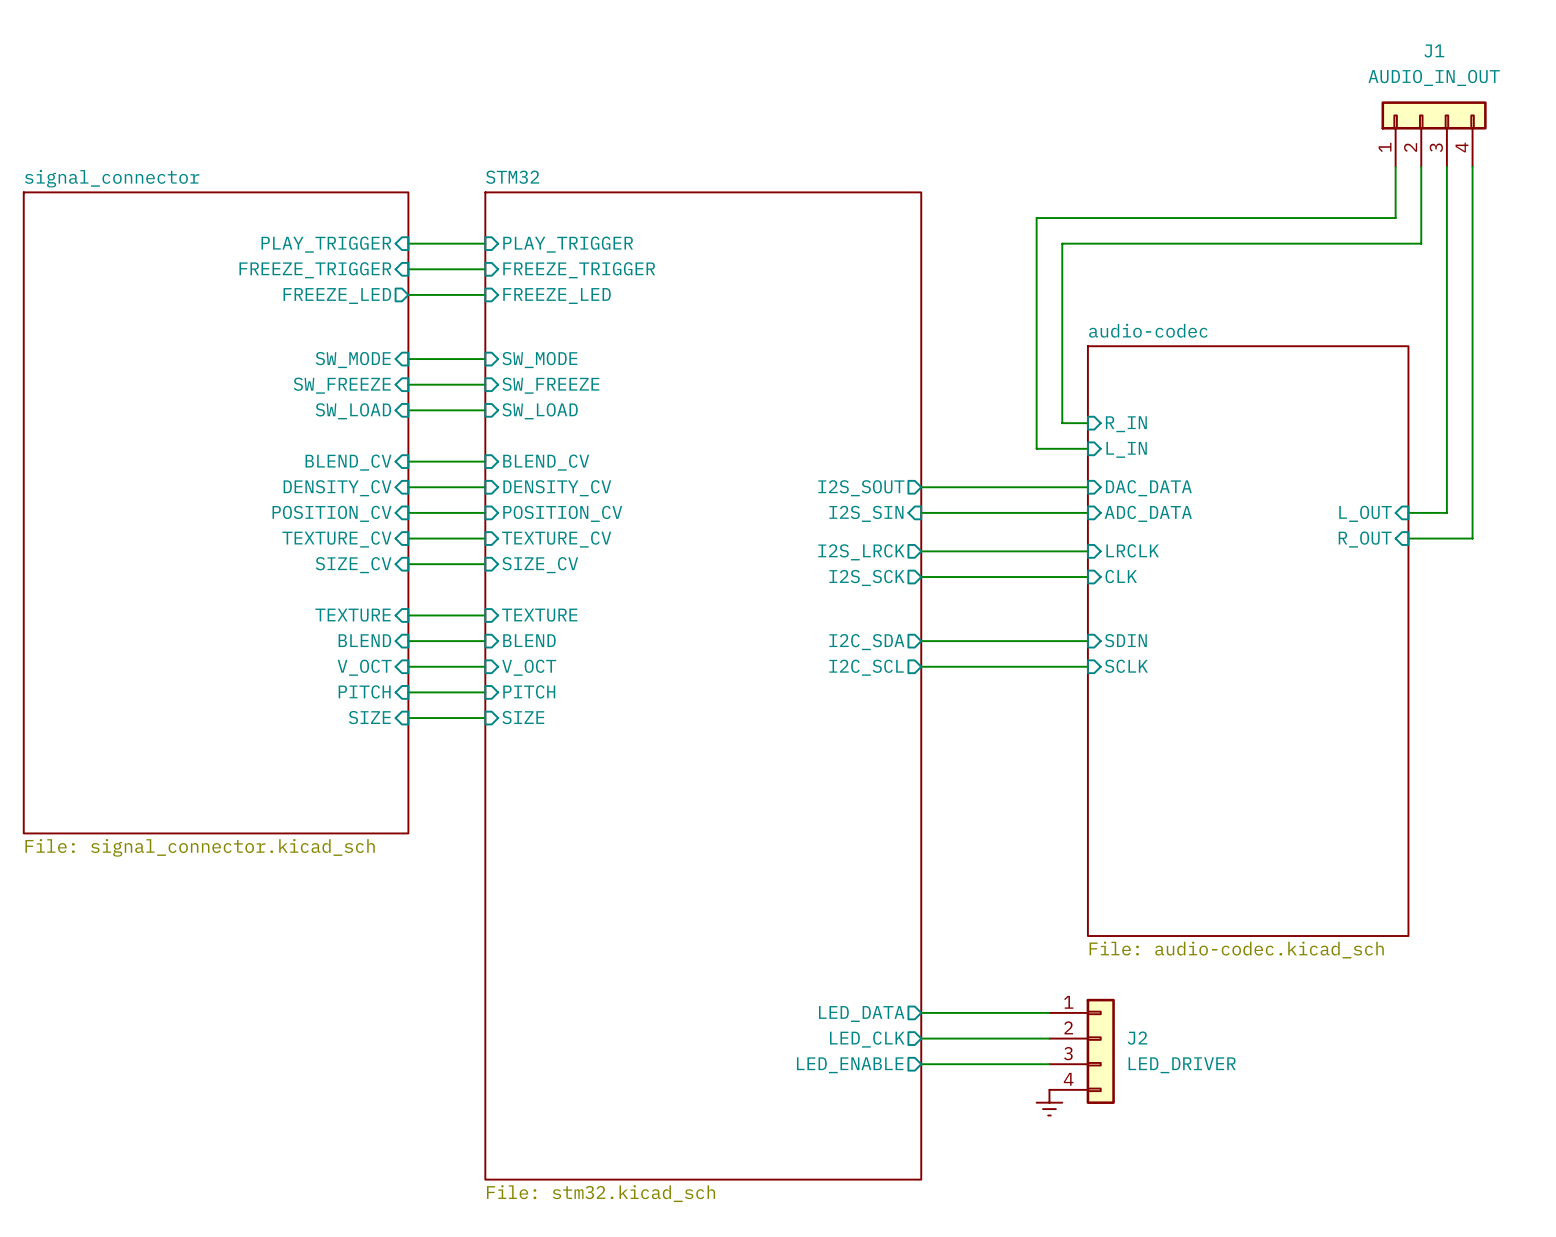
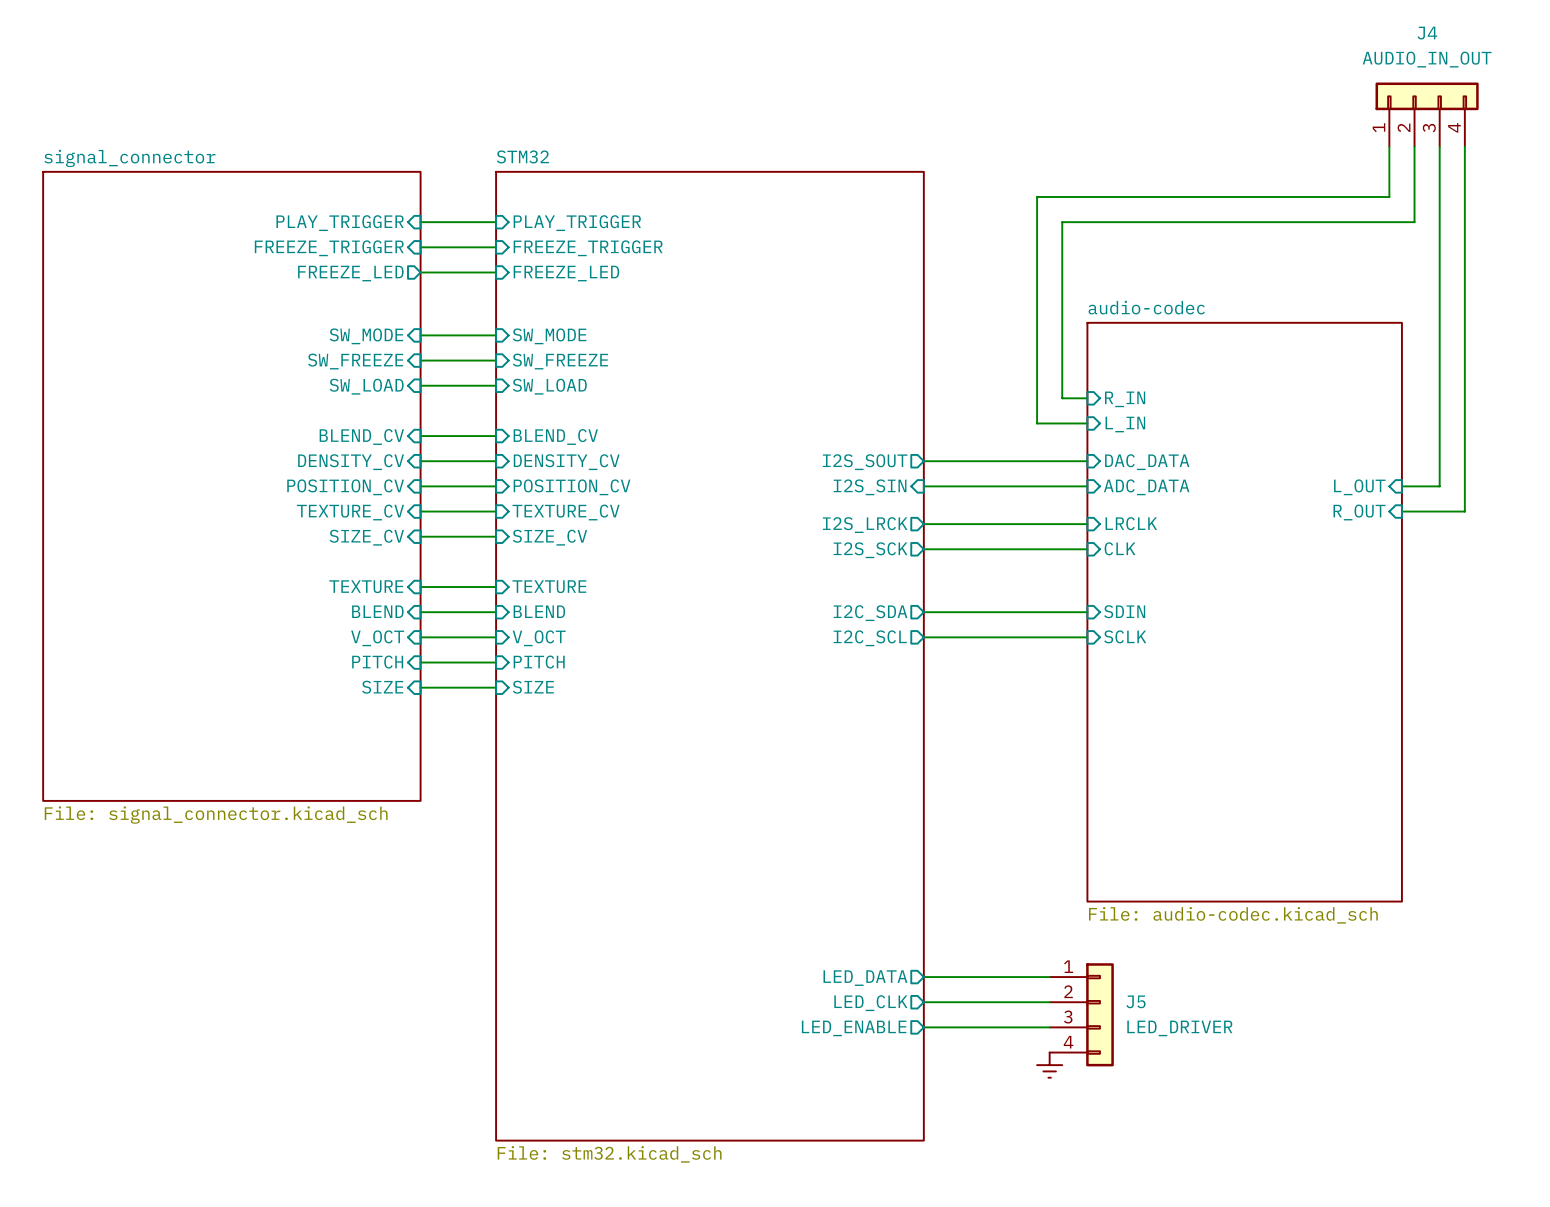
J1 name: J1 (1434, 50) -> J4 (1427, 33)
J2 name: J2 (1137, 1038) -> J5 (1136, 1001)

